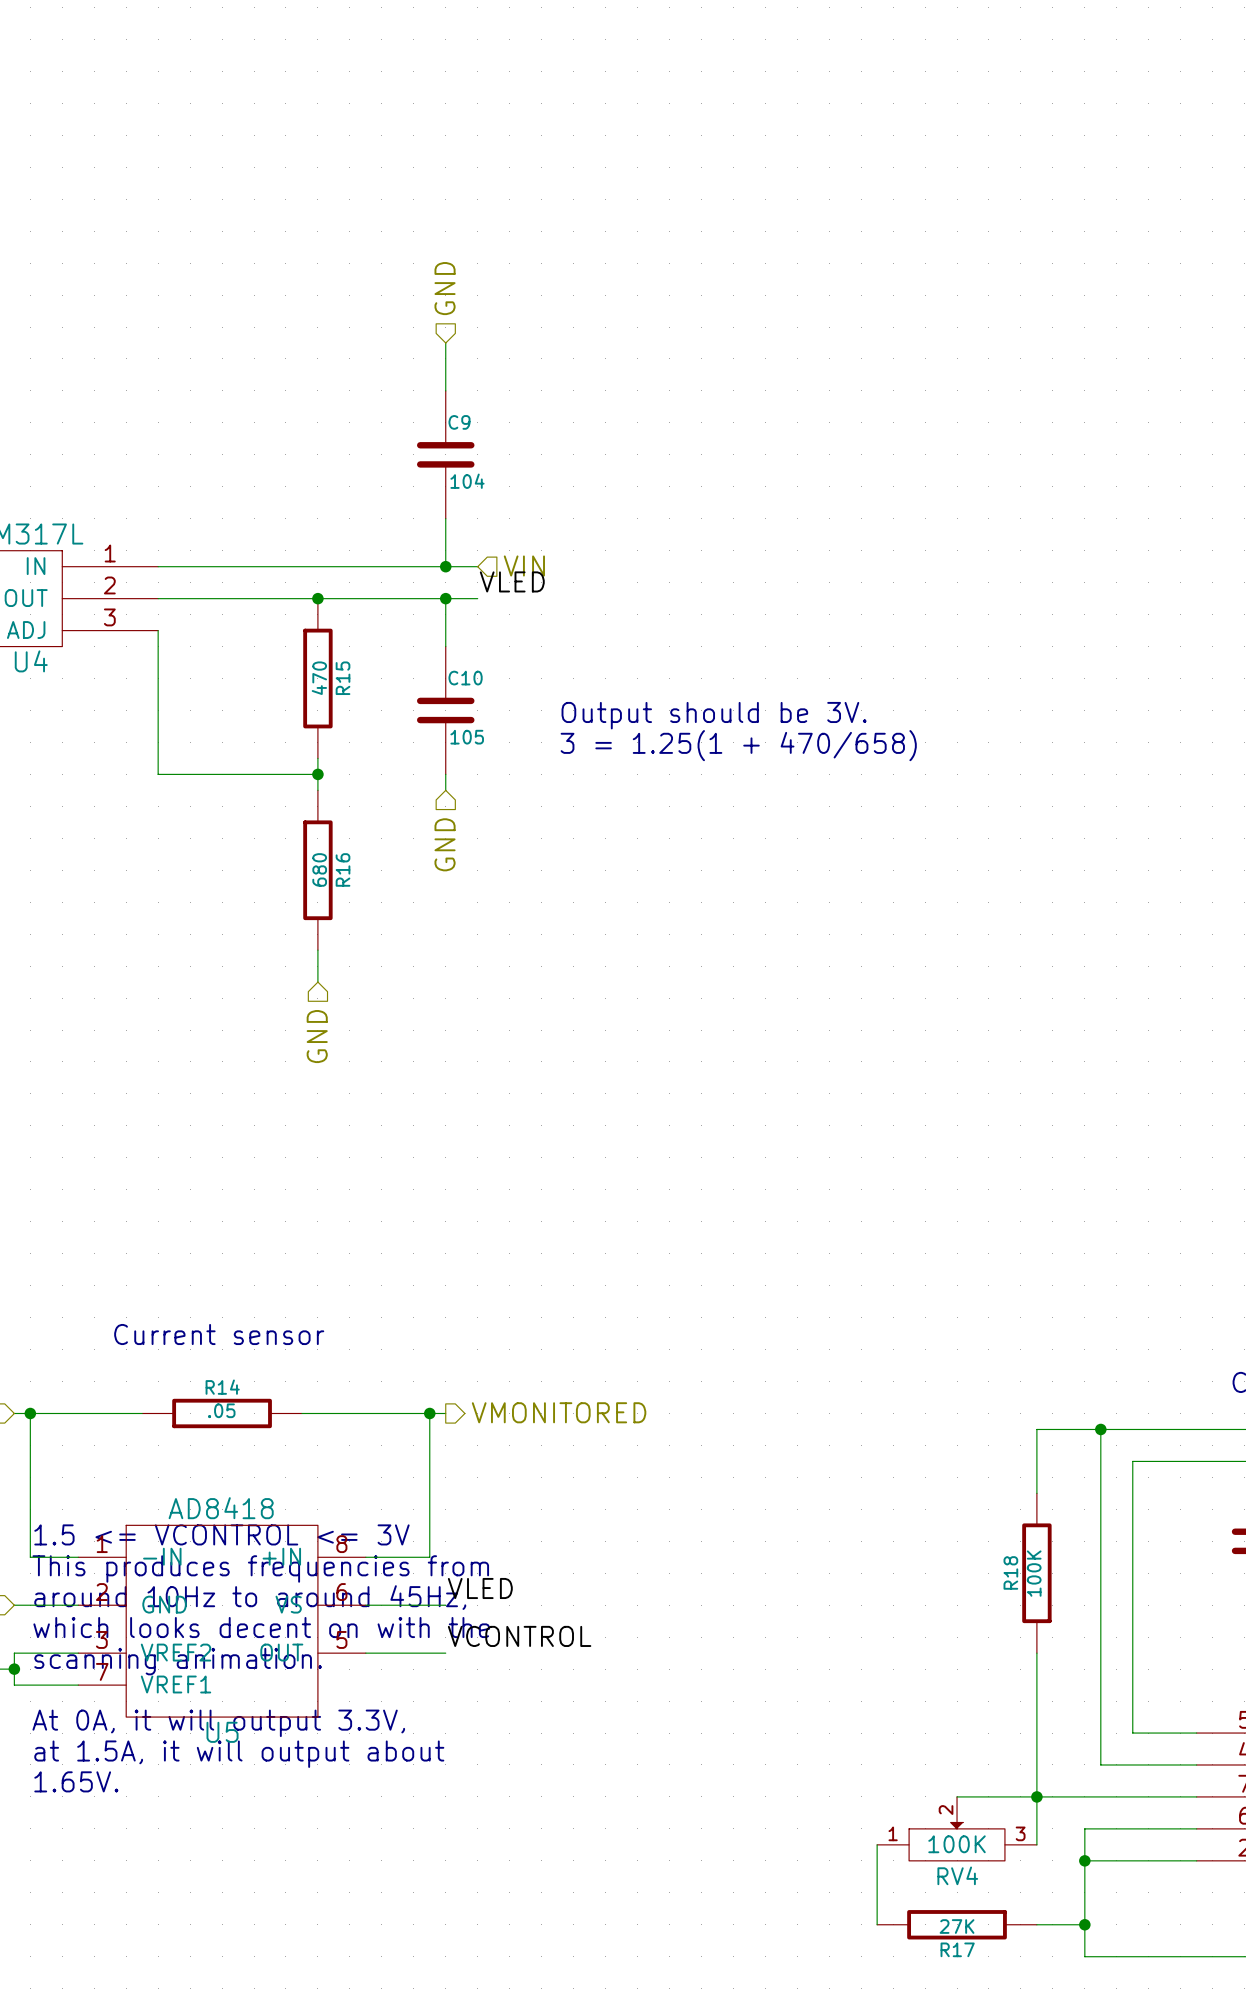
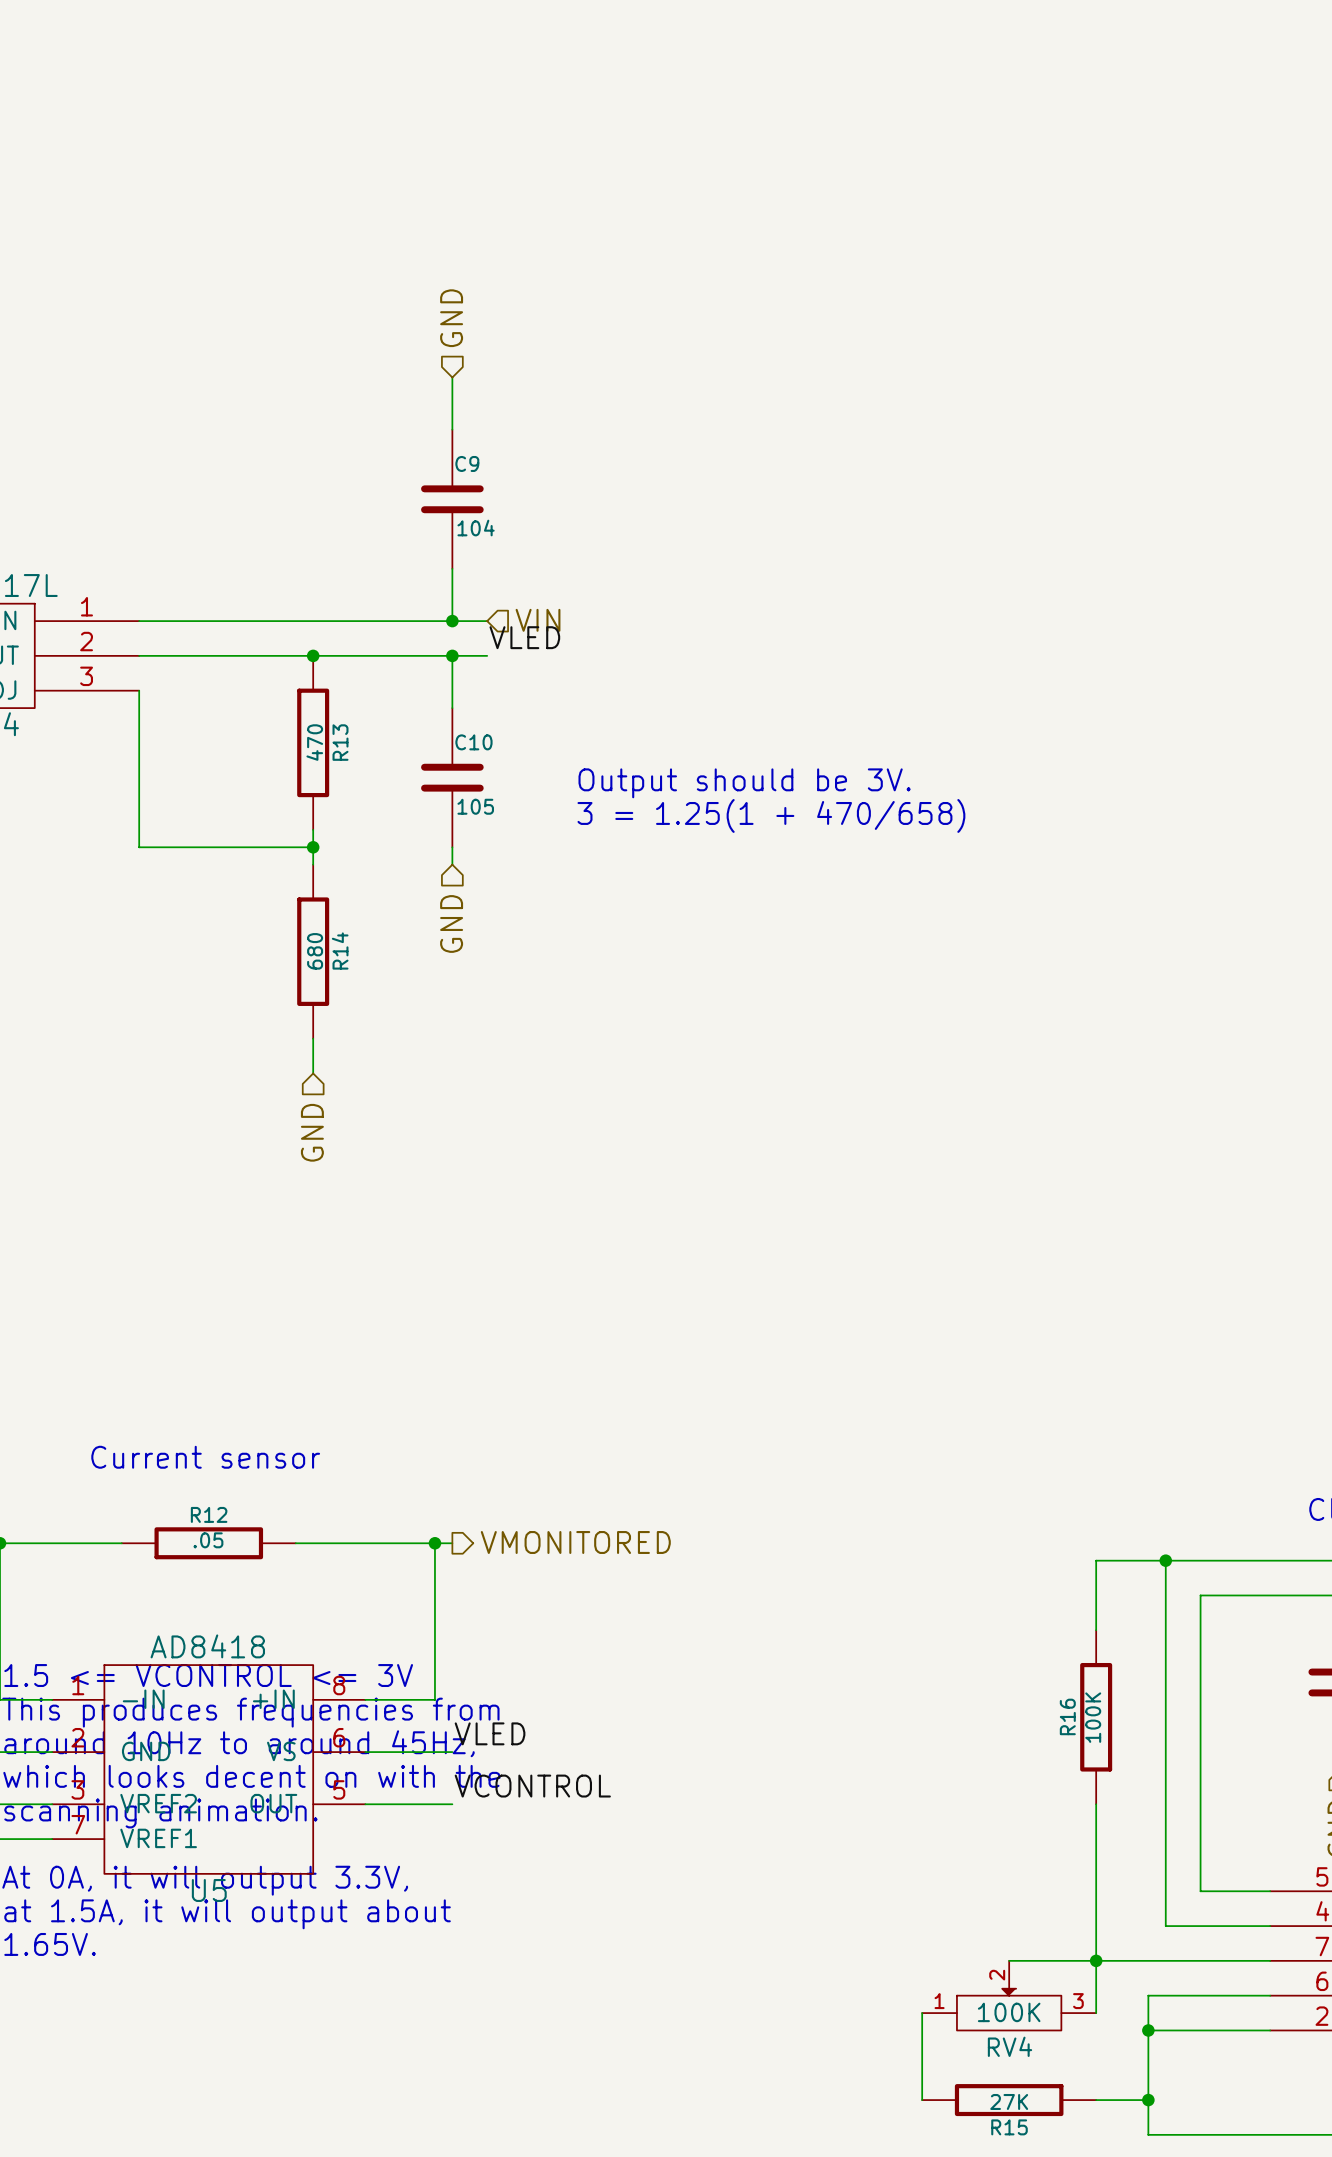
R15 name: R15 (343, 678) -> R13 (340, 742)
R16 name: R16 (343, 869) -> R14 (340, 951)
R14 name: R14 (222, 1387) -> R12 (209, 1514)
R18 name: R18 (1010, 1572) -> R16 (1067, 1716)
R17 name: R17 (957, 1949) -> R15 (1009, 2127)

